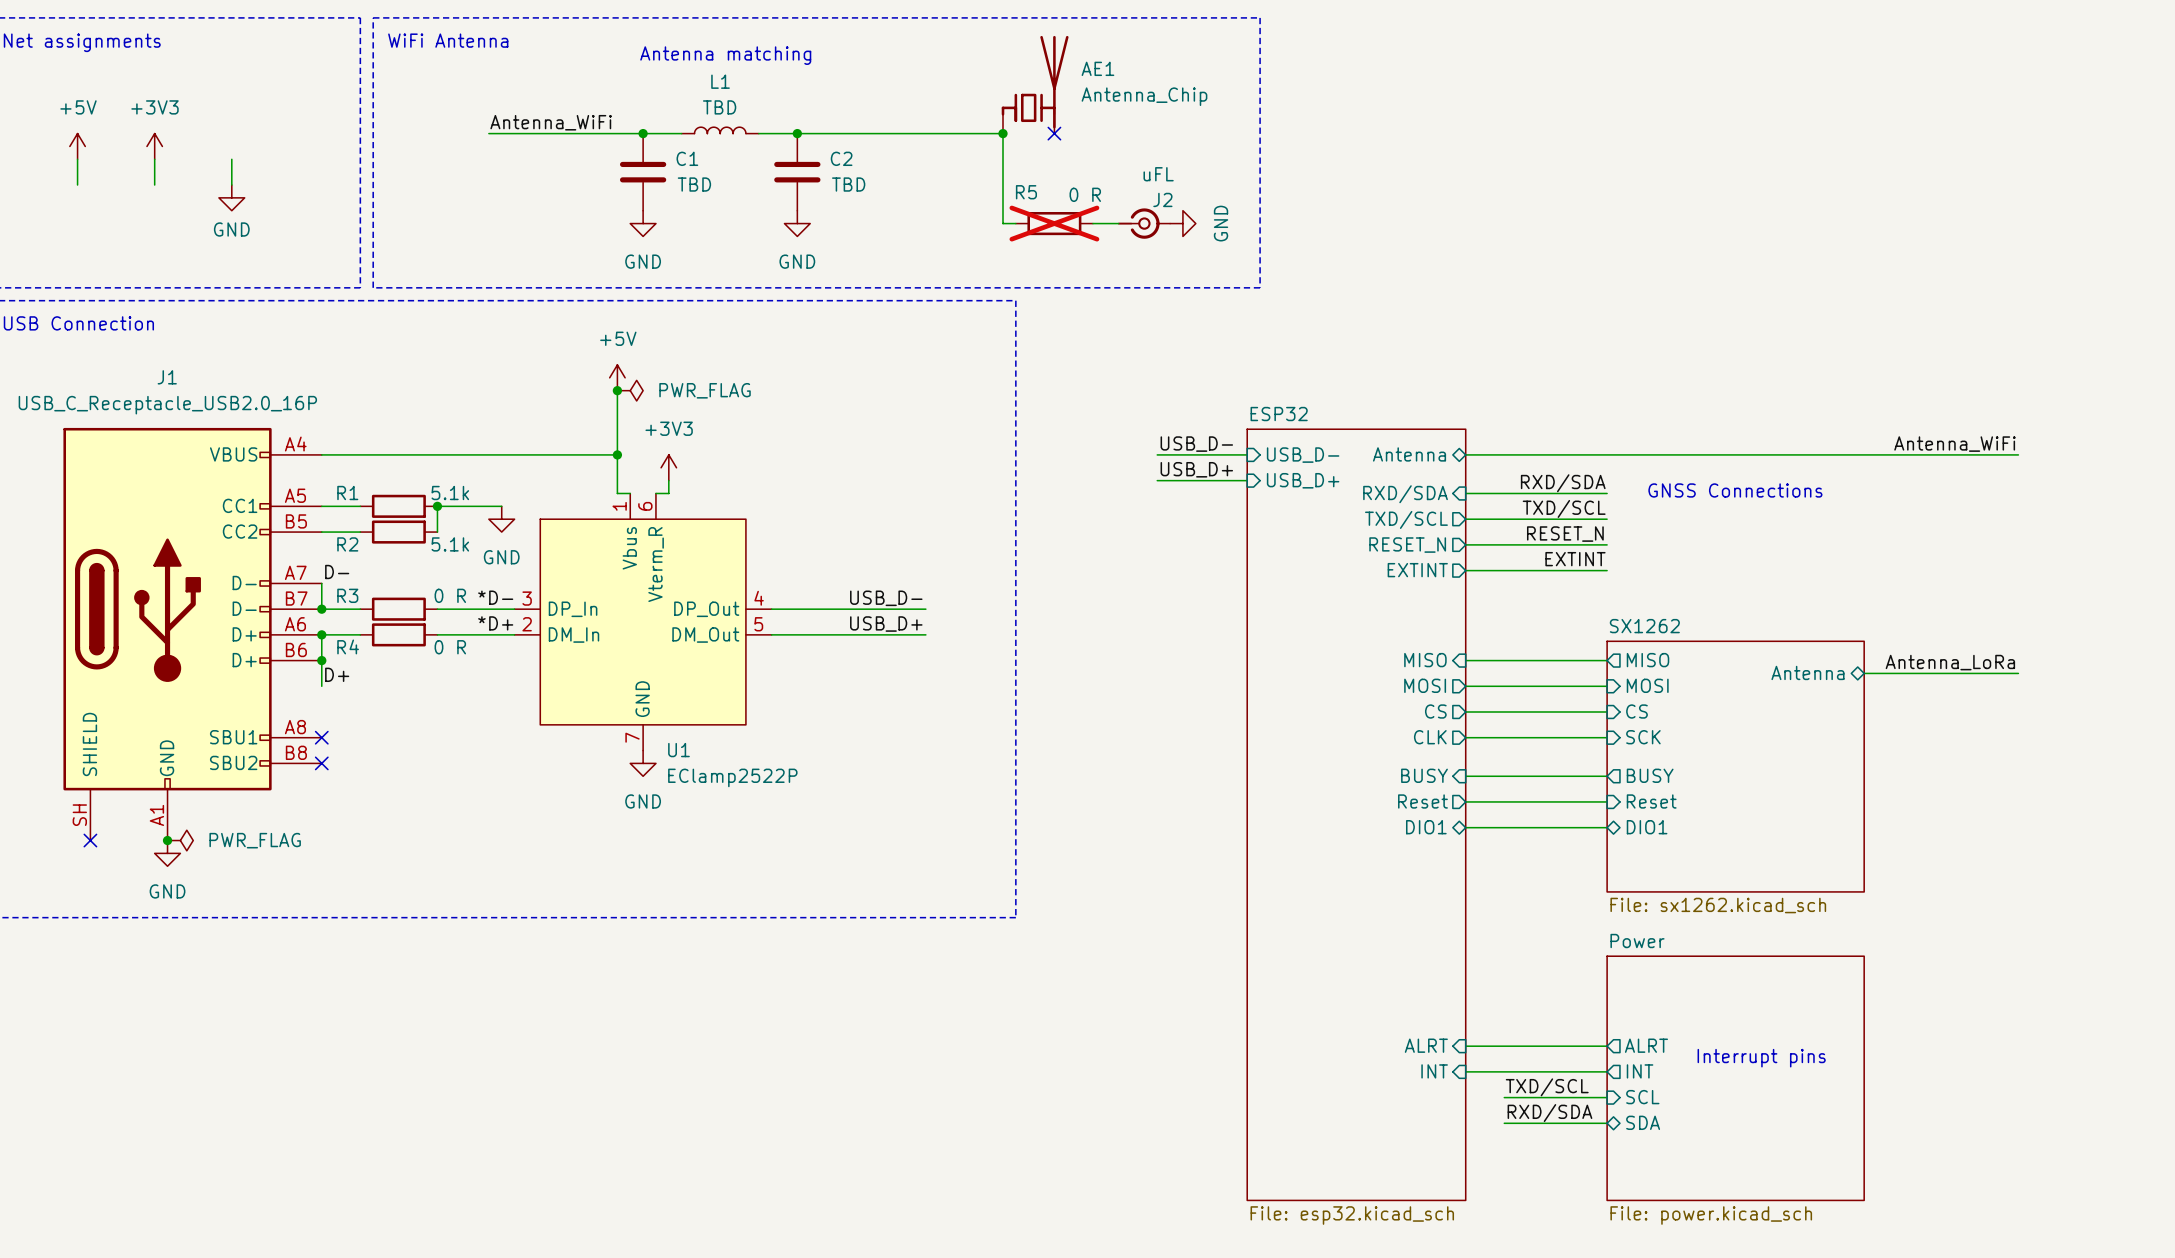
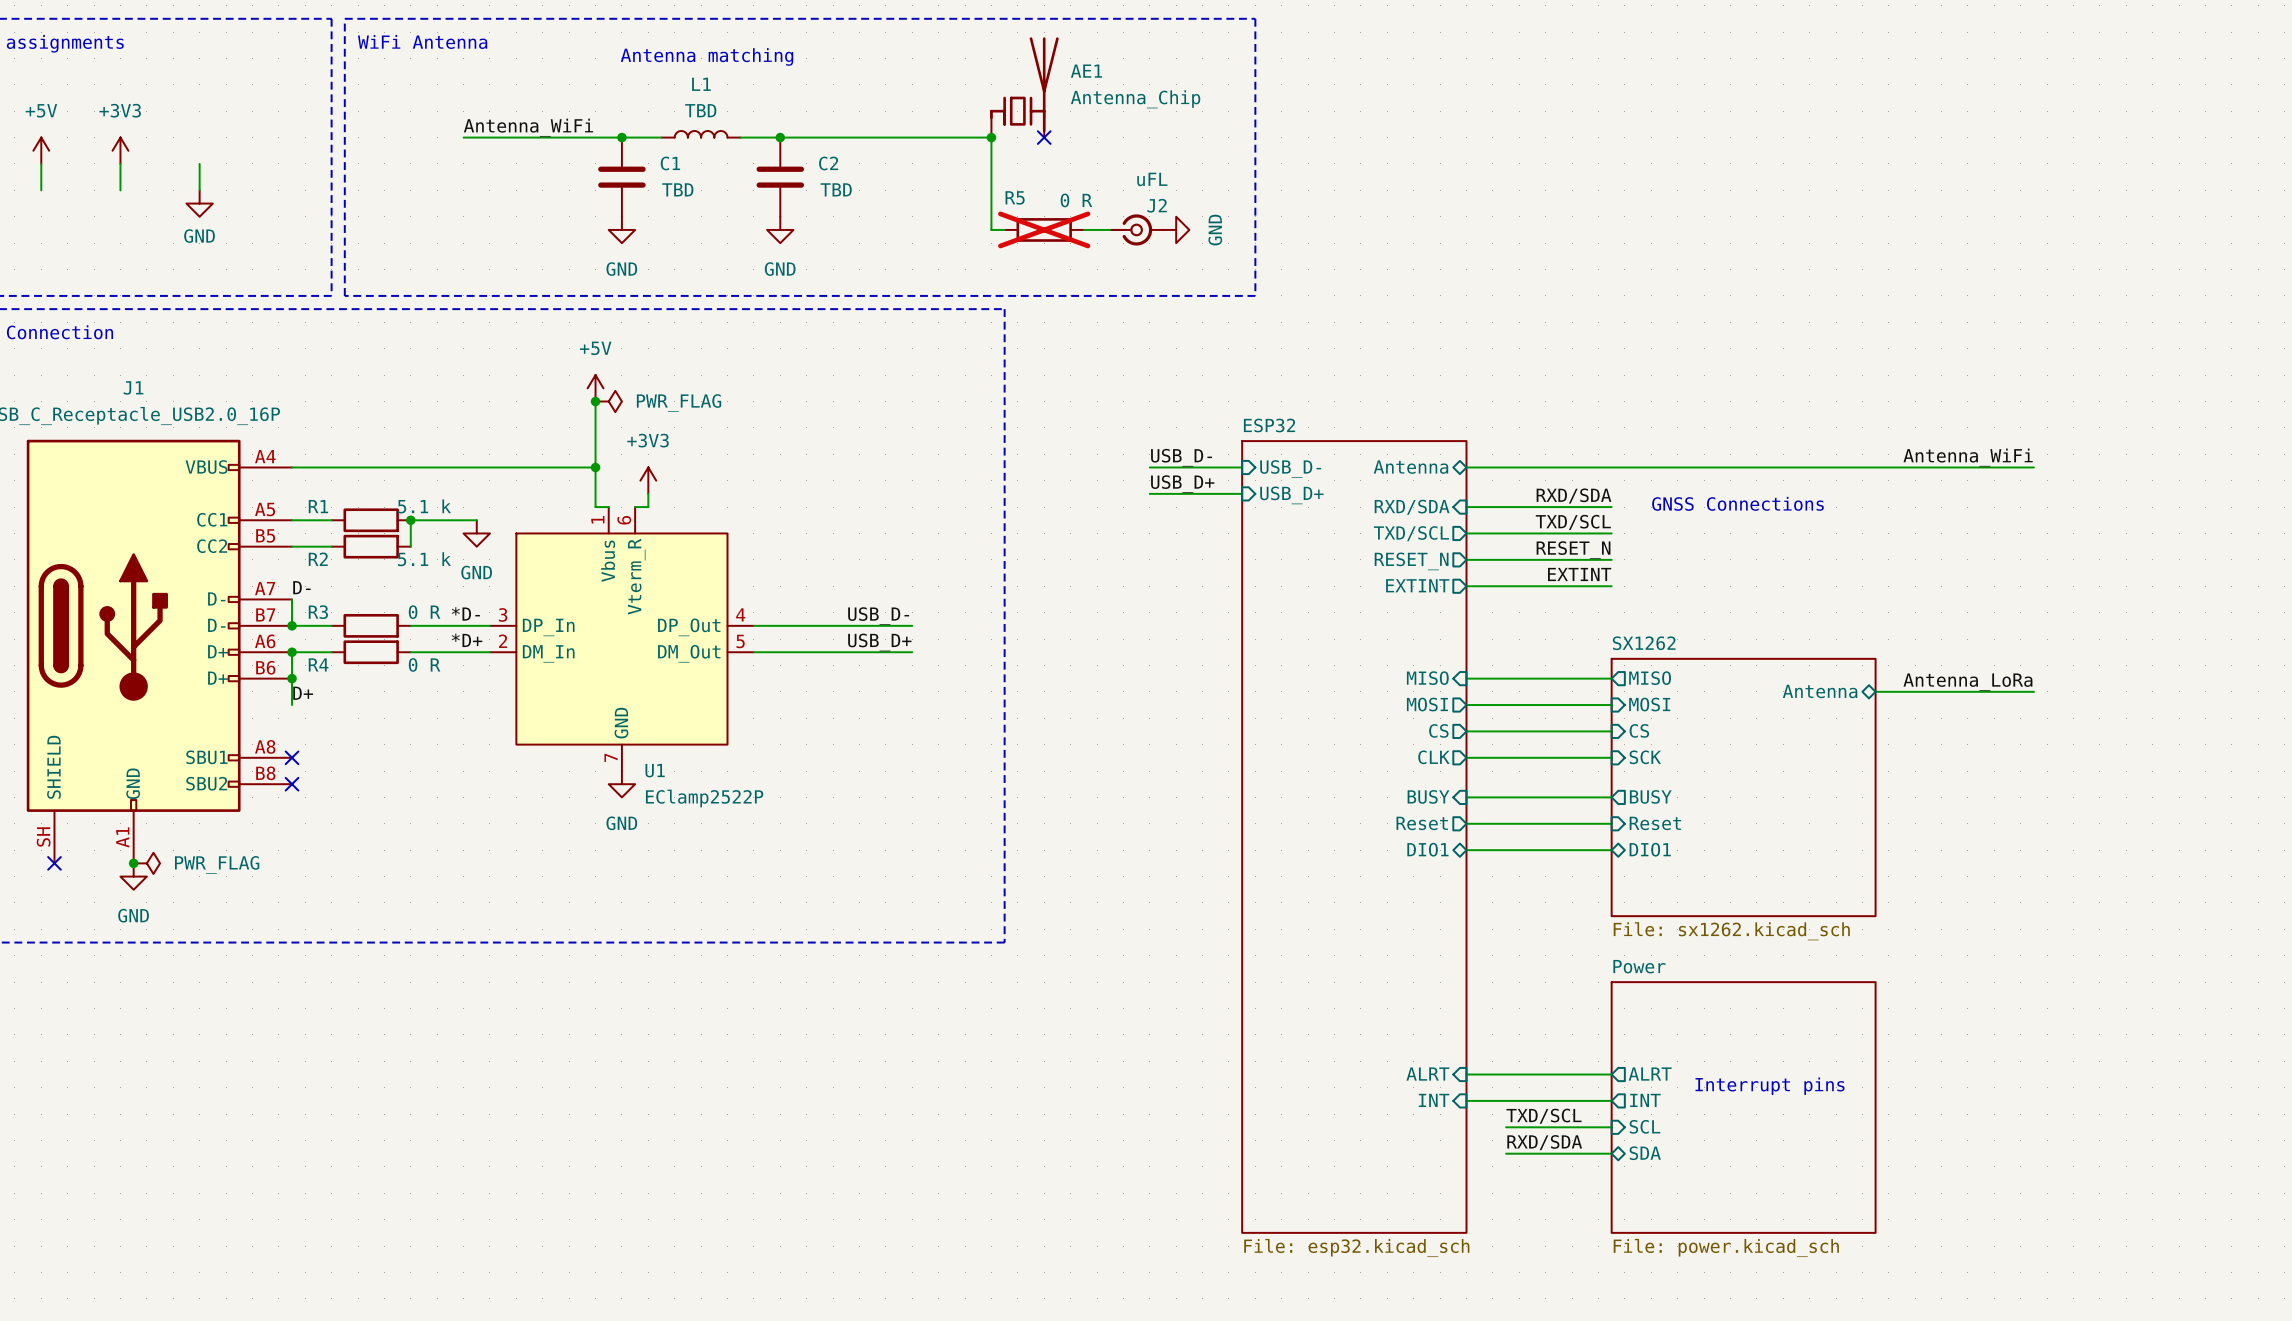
R1 value: 5.1k (450, 493) -> 5.1 k (424, 506)
R2 value: 5.1k (450, 544) -> 5.1 k (424, 559)

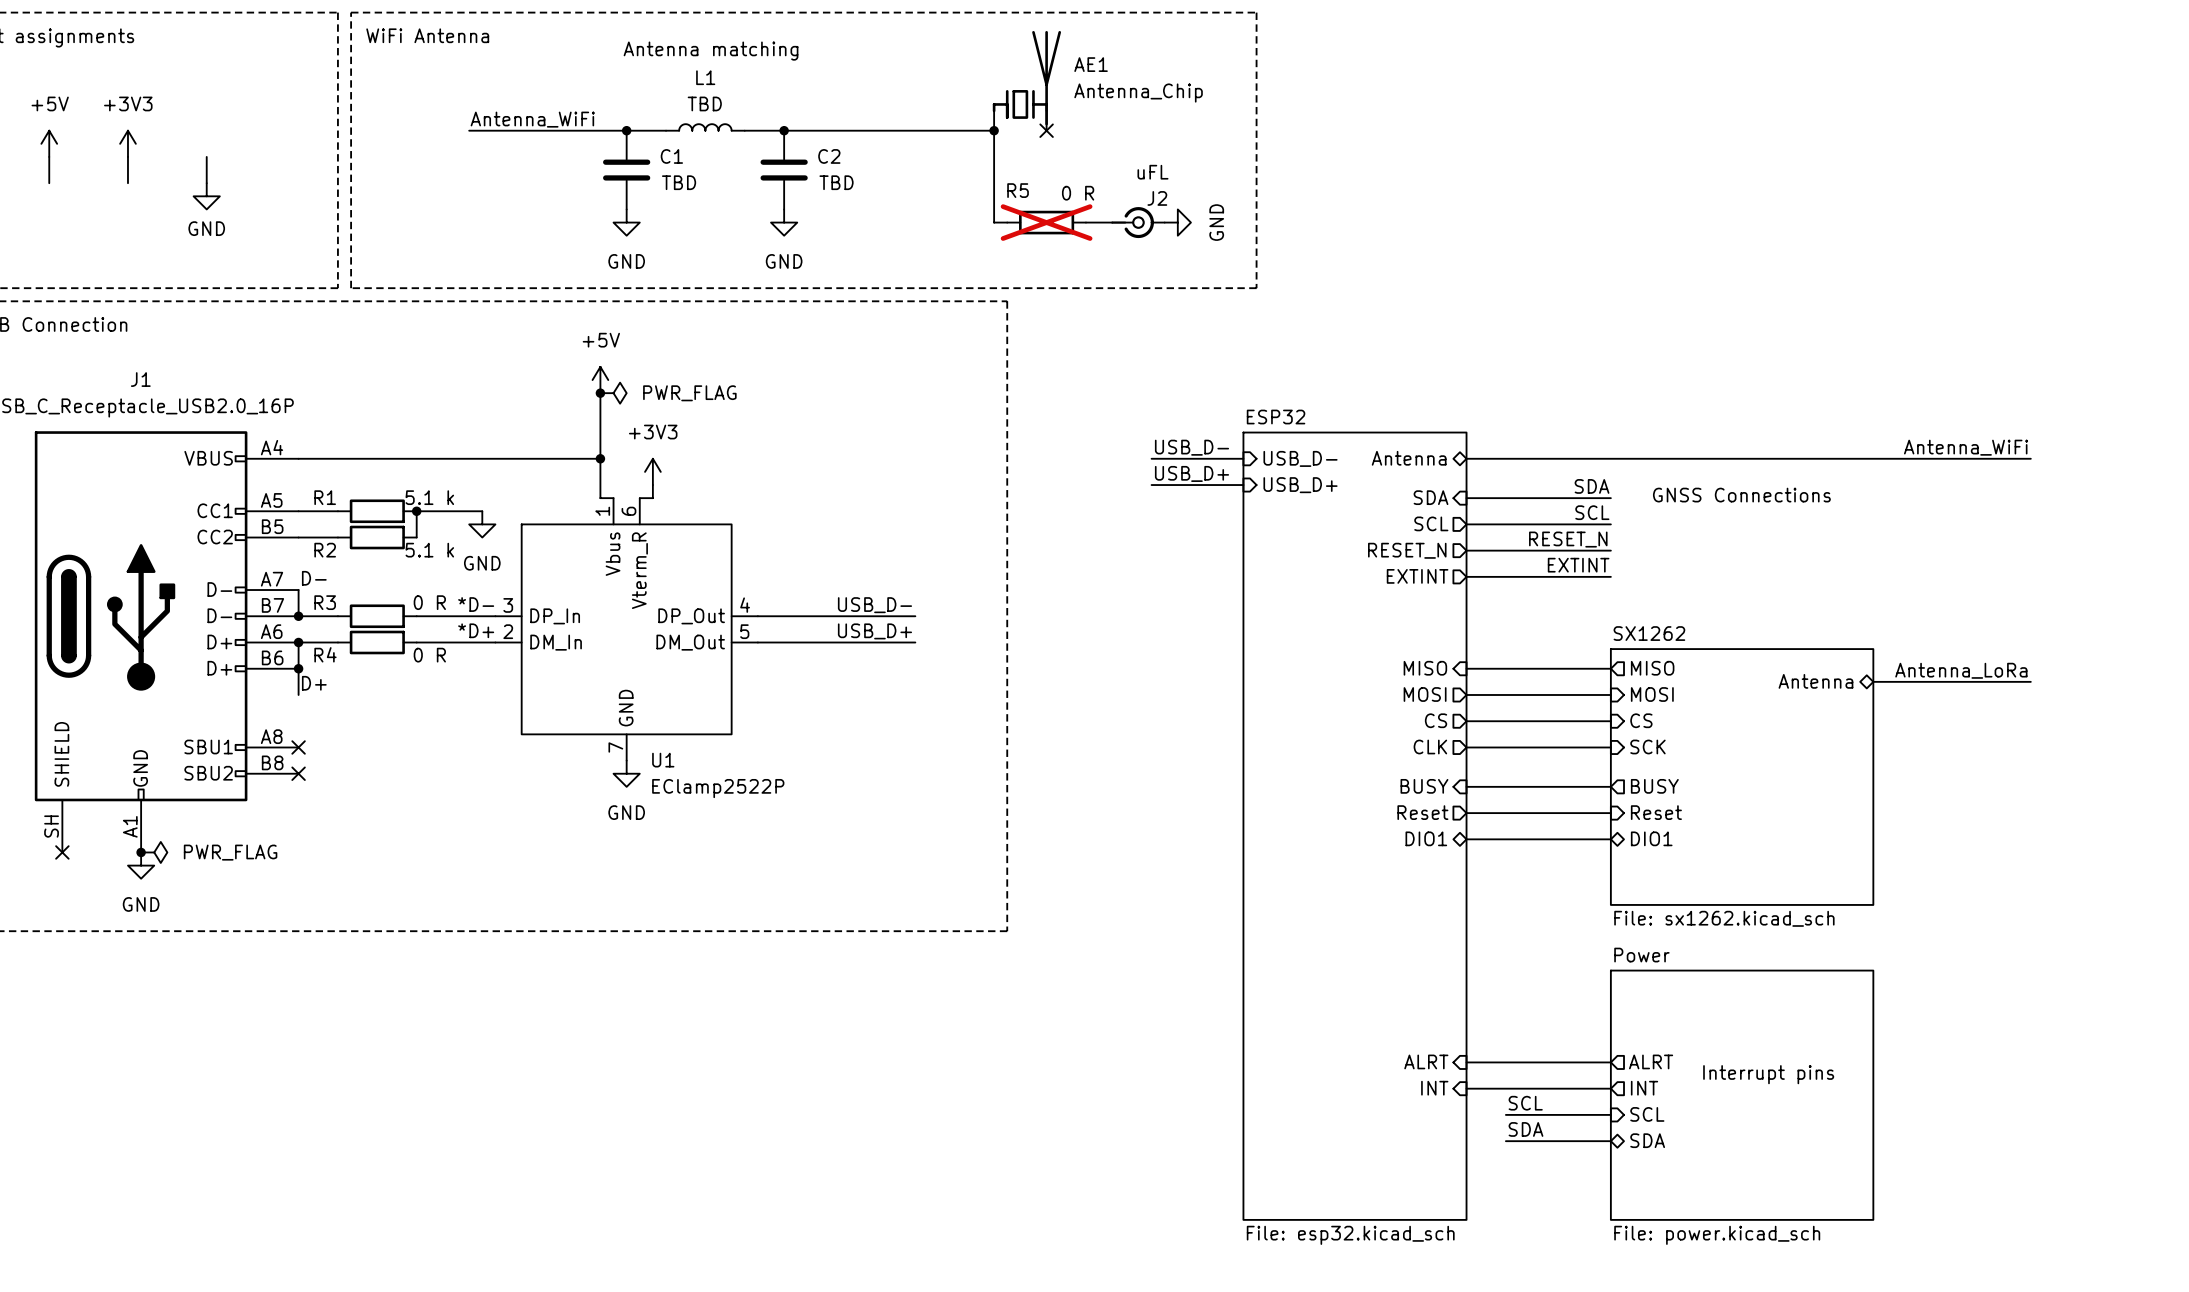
label: RXD/SDA (1573, 496) -> SDA (1592, 486)
sheet pin: RXD/SDA (1412, 507) -> SDA (1431, 497)
label: TXD/SCL (1573, 522) -> SCL (1592, 512)
sheet pin: TXD/SCL (1411, 533) -> SCL (1431, 523)
label: TXD/SCL (1544, 1116) -> SCL (1525, 1103)
label: RXD/SDA (1544, 1142) -> SDA (1525, 1129)

